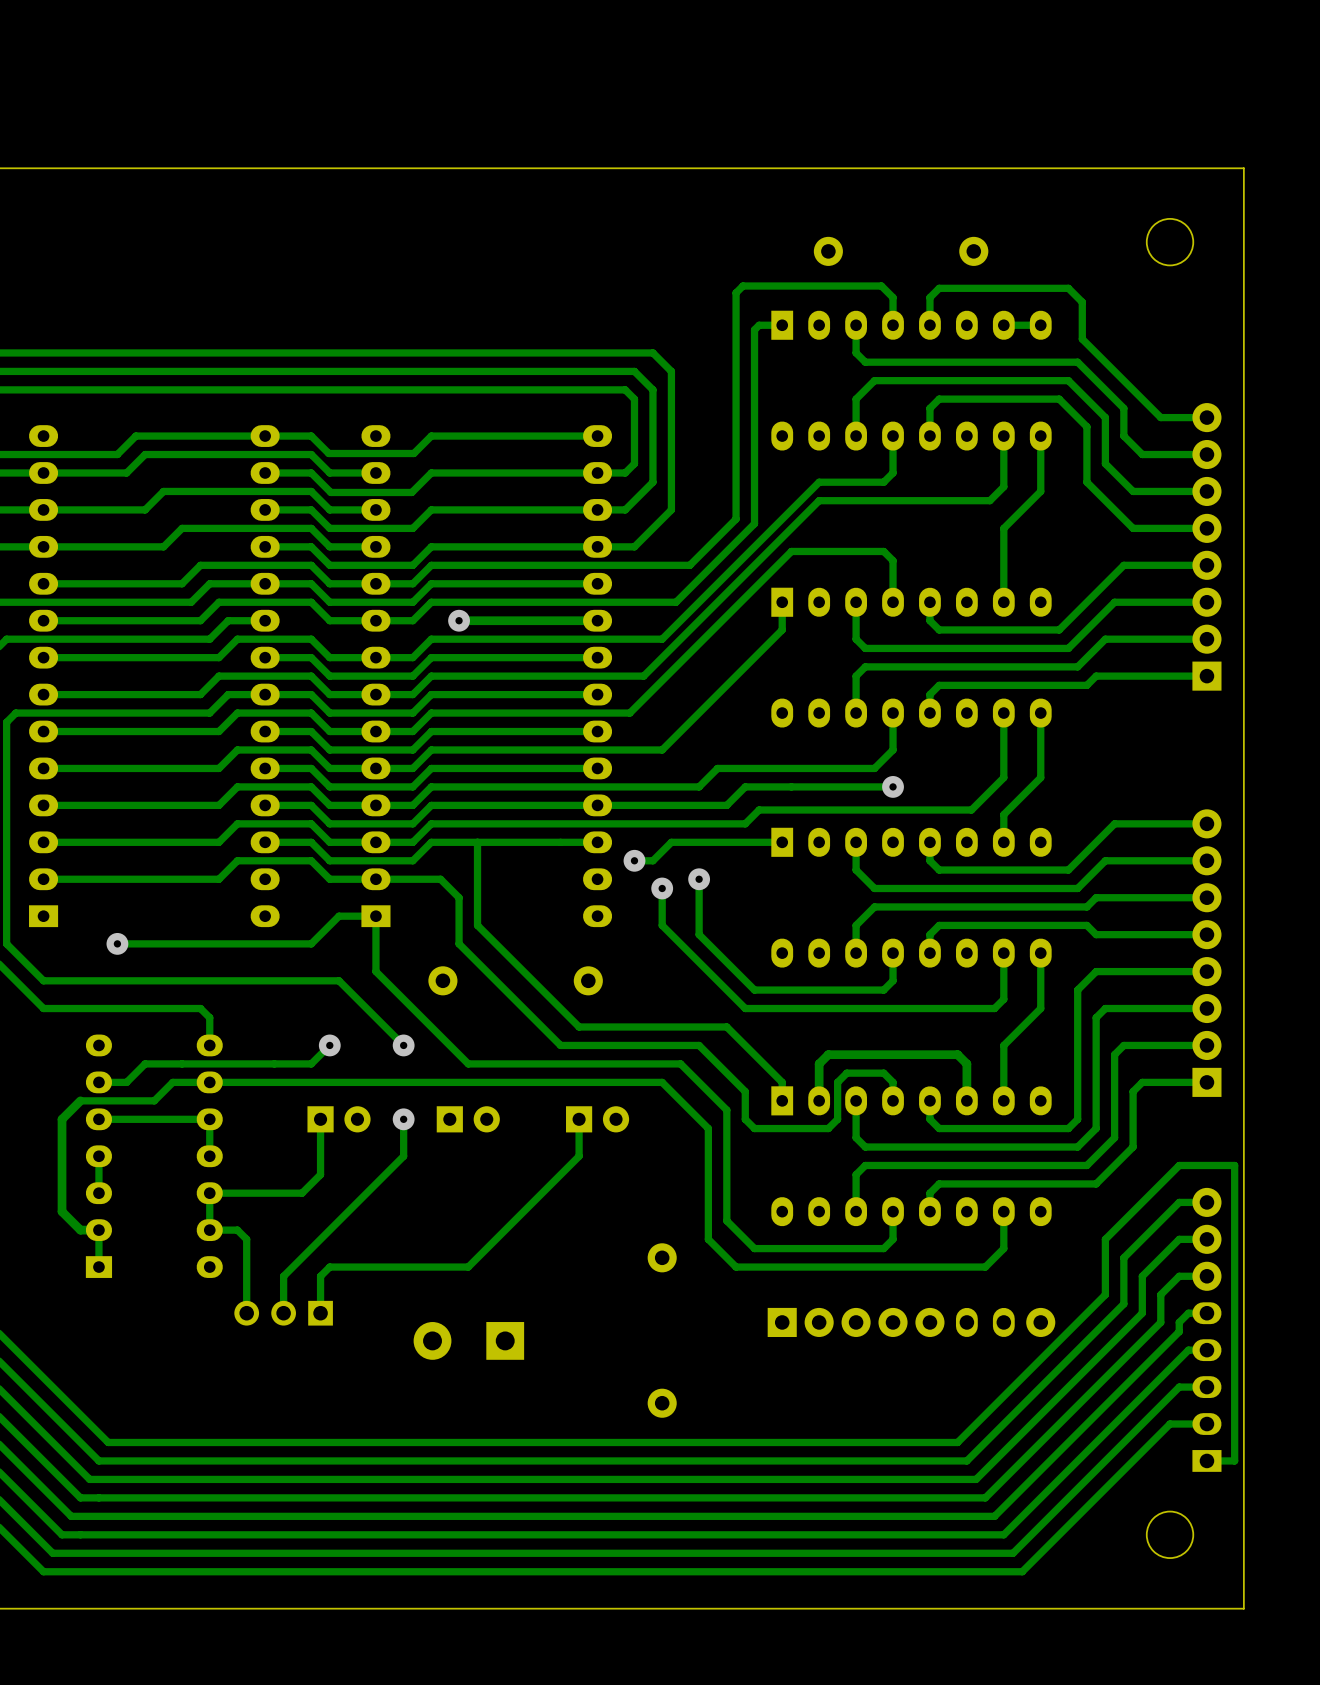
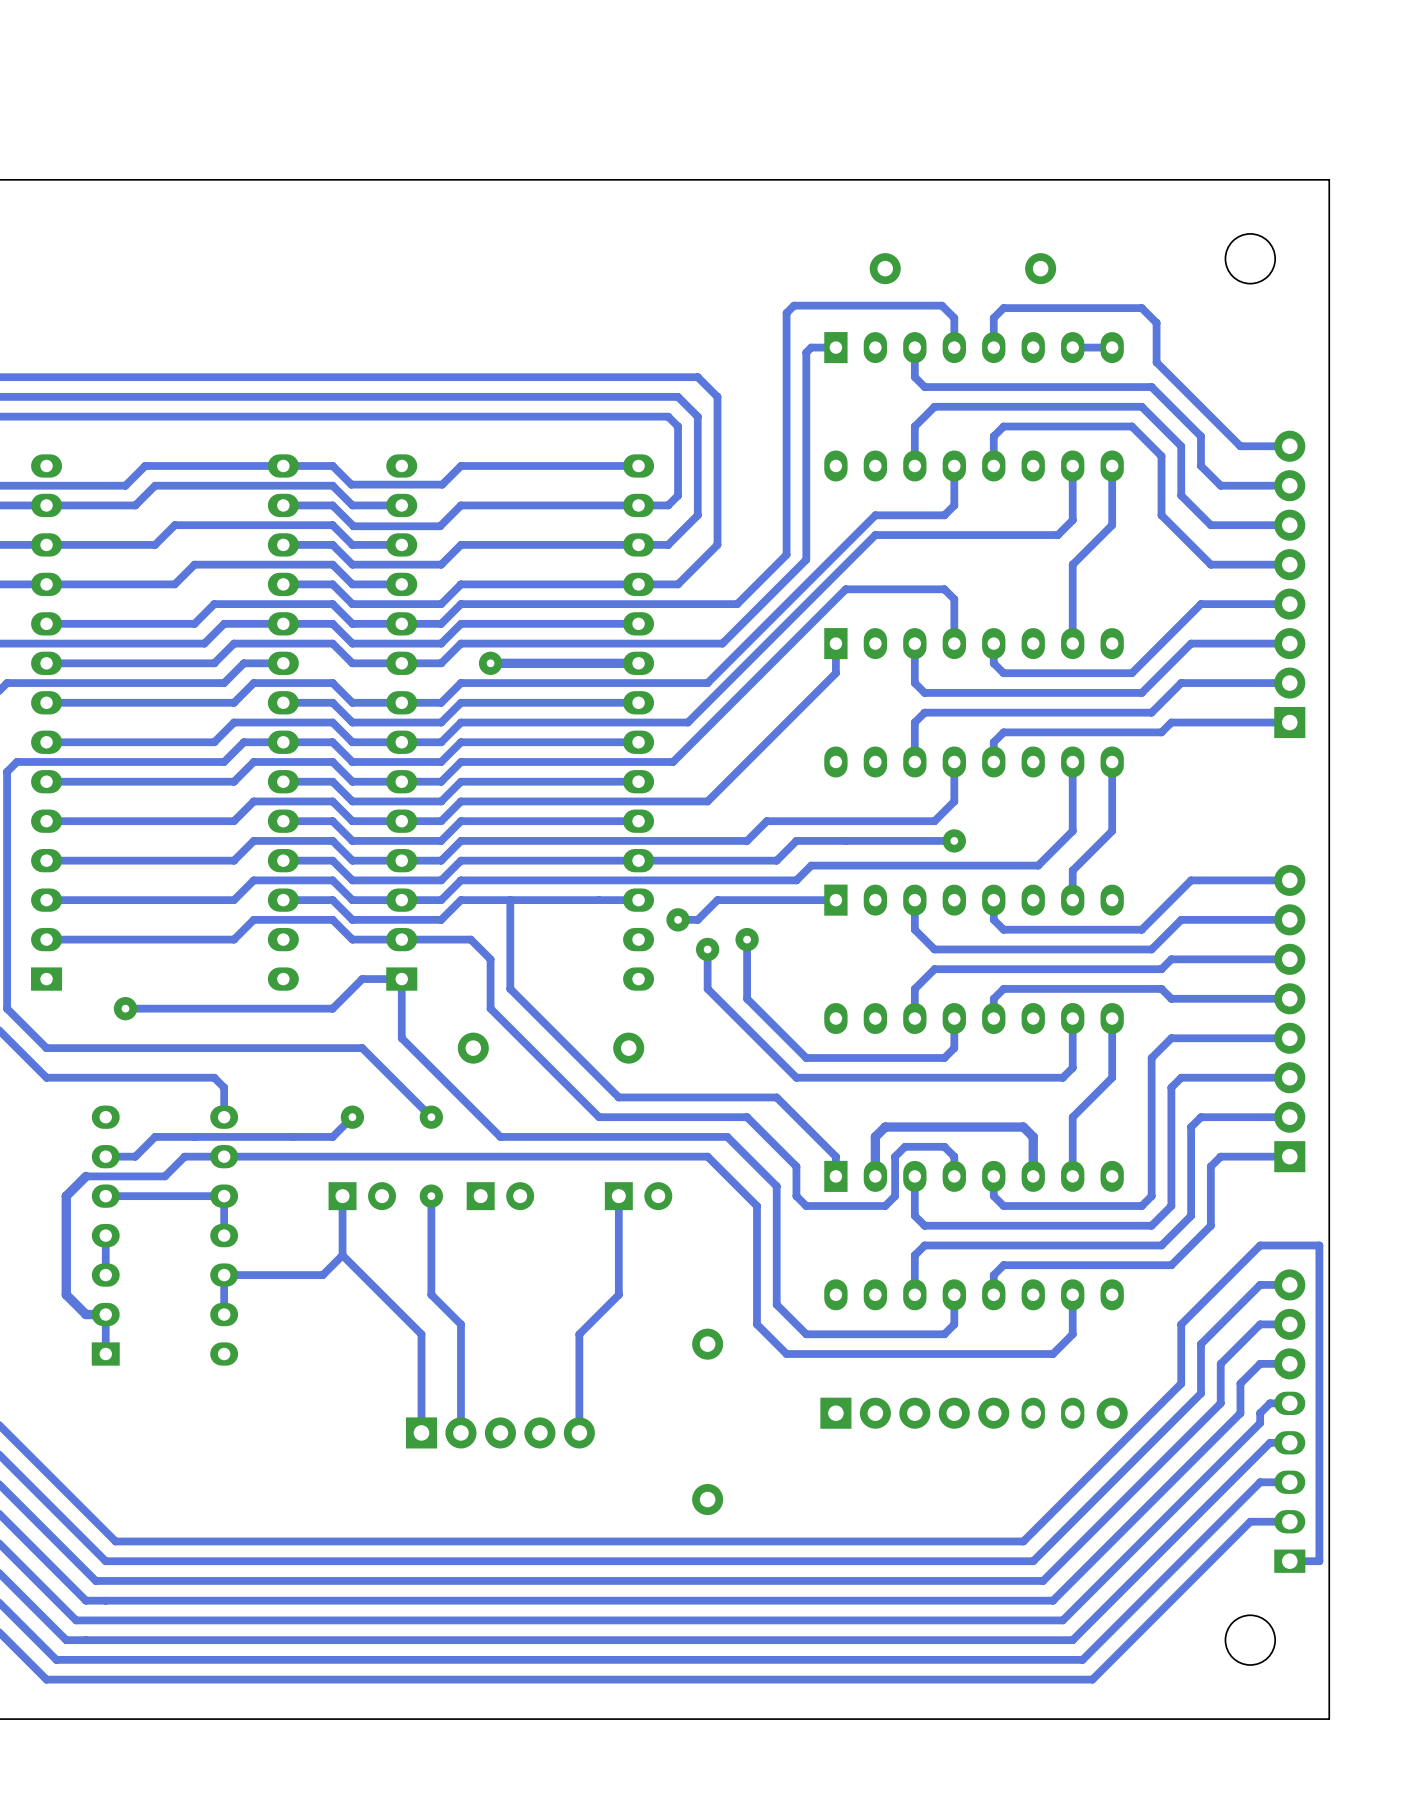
track: (403, 1156) (283, 1276) (283, 1313) -> (431, 1235) (431, 1294) (460, 1324) (460, 1432)
track: (579, 1156) (468, 1267) (329, 1267) (320, 1276) (320, 1313) -> (618, 1235) (618, 1294) (579, 1334) (579, 1432)
track: none -> (342, 1255) (421, 1334) (421, 1432)
track: (209, 1230) (237, 1230) (246, 1239) (246, 1313) -> none
part: (283, 1313) -> none
part footprint: [413, 1322, 525, 1360] -> [405, 1417, 595, 1449]

